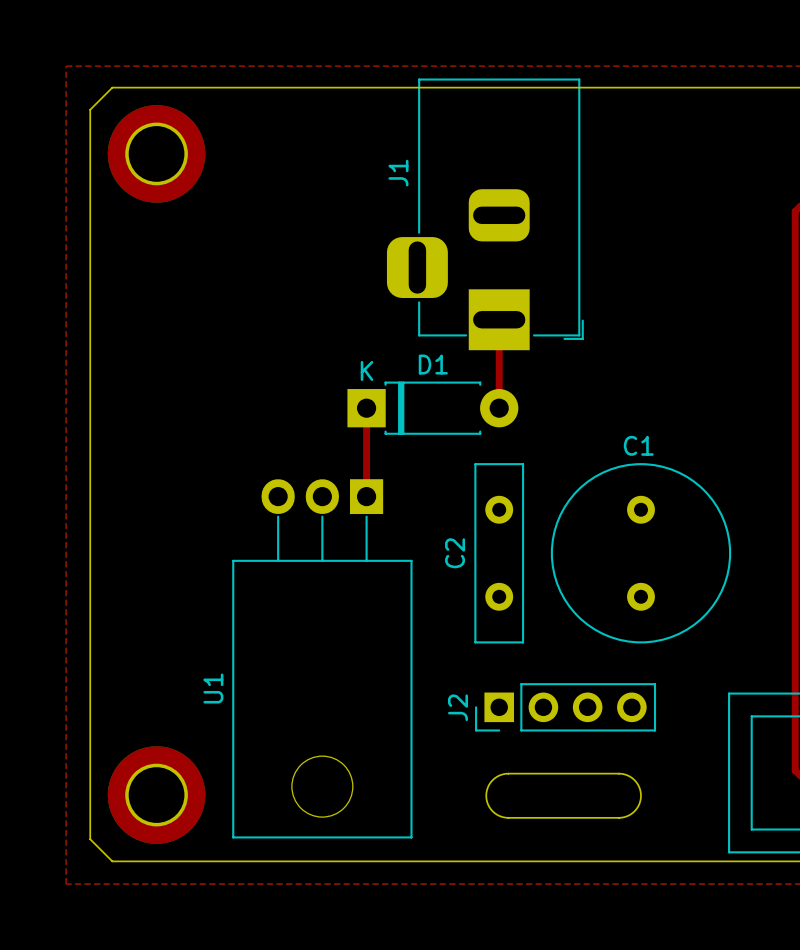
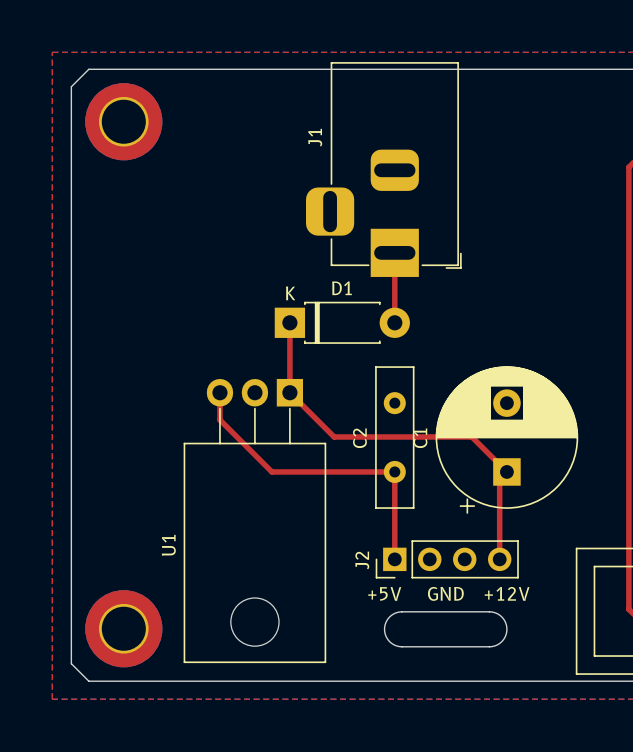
C1 name position: C1 (638, 445) -> C1 (420, 438)
C1 footprint: [550, 463, 732, 644] -> [435, 366, 579, 514]
top track: none -> (219, 392) (219, 419) (271, 471) (394, 471) (394, 559)
top track: none -> (289, 392) (334, 436) (471, 436) (506, 471) (499, 479) (499, 559)
text: none -> +5V (384, 593)
text: none -> GND (445, 593)
text: none -> +12V (507, 593)

